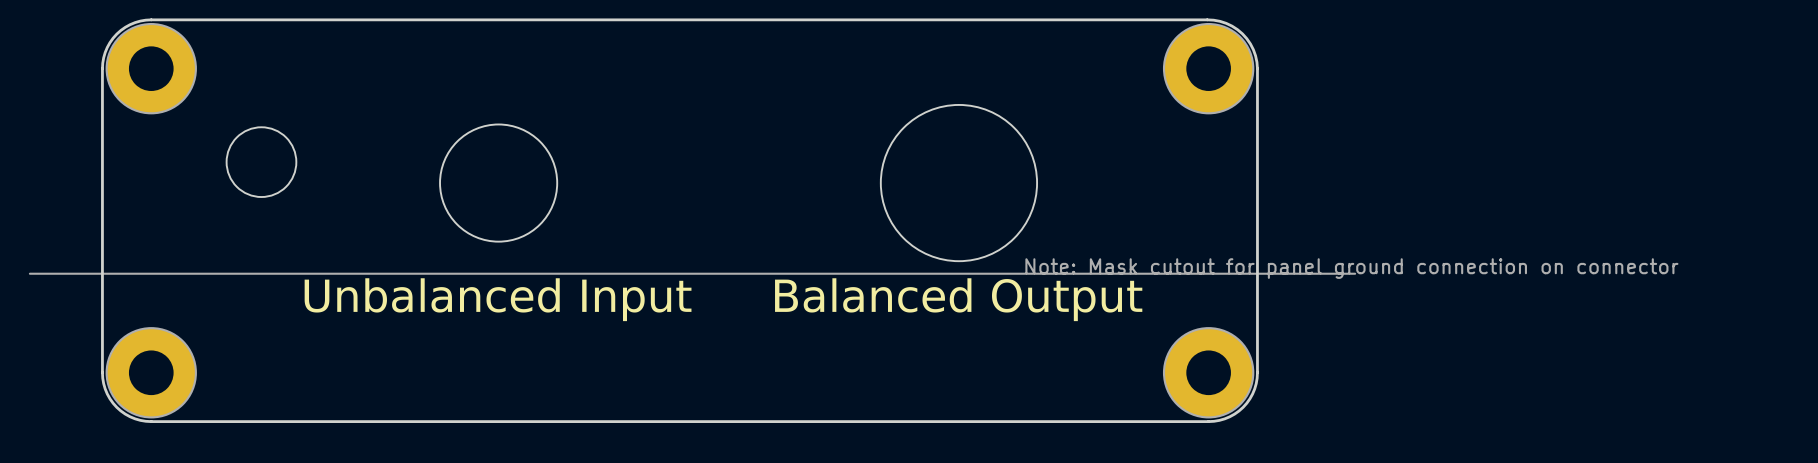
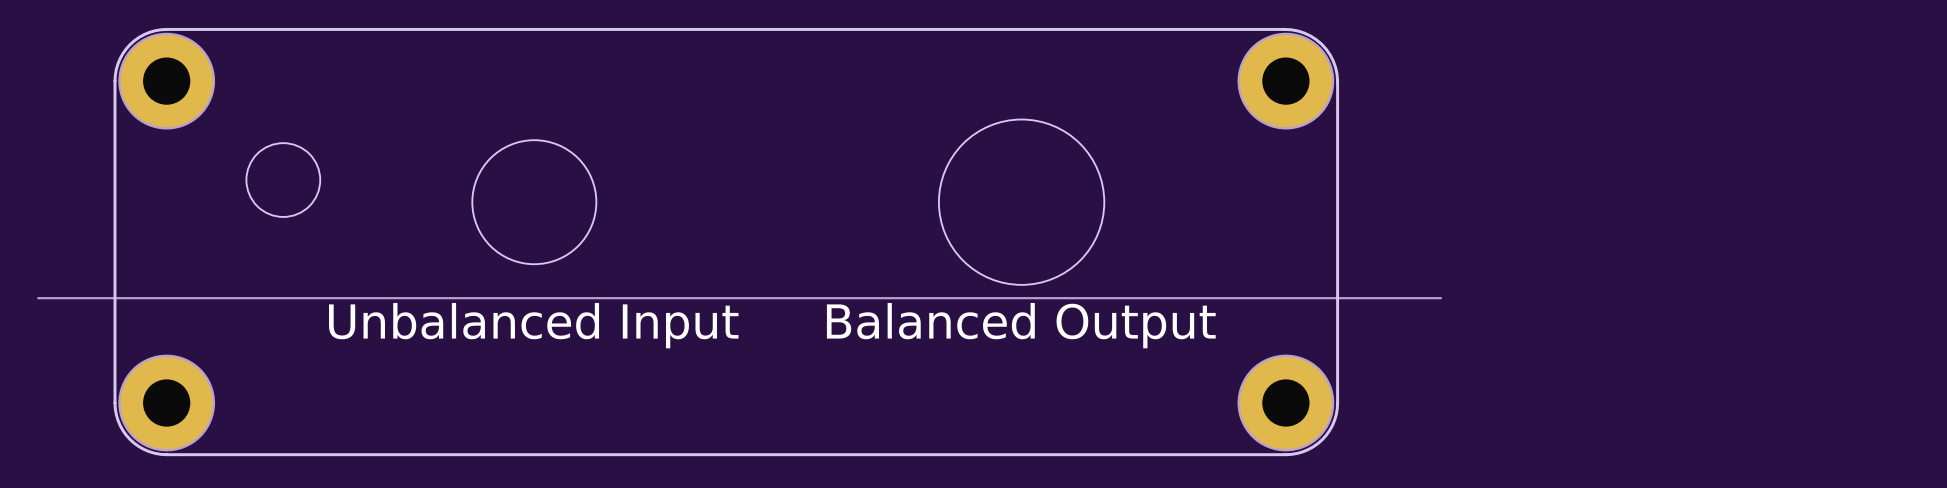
drawing shape: [879, 104, 1679, 279] -> [938, 118, 1106, 286]

